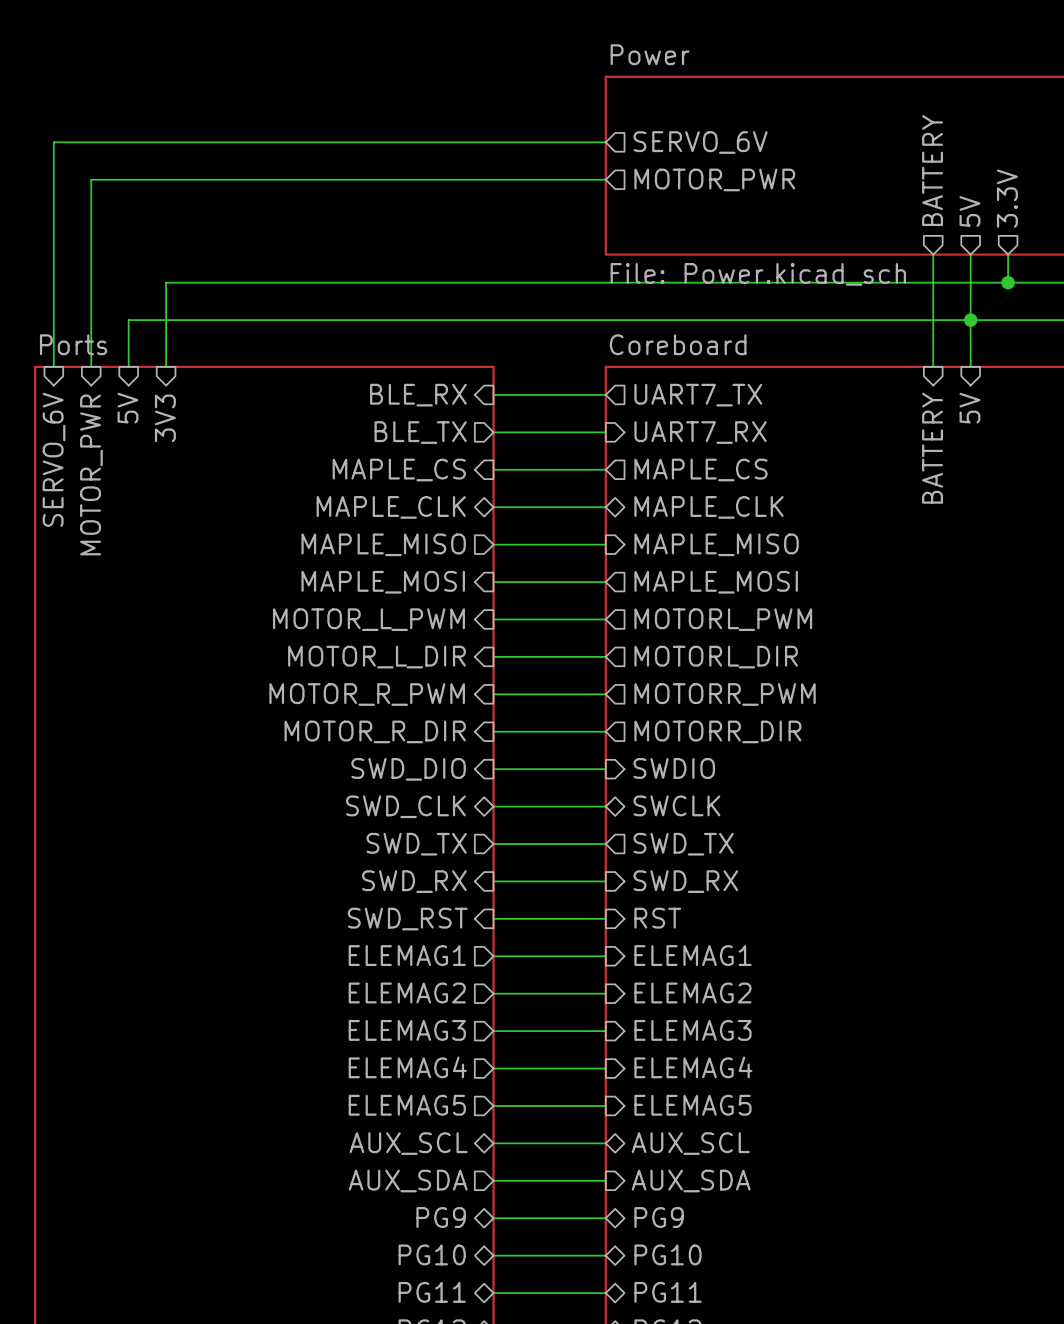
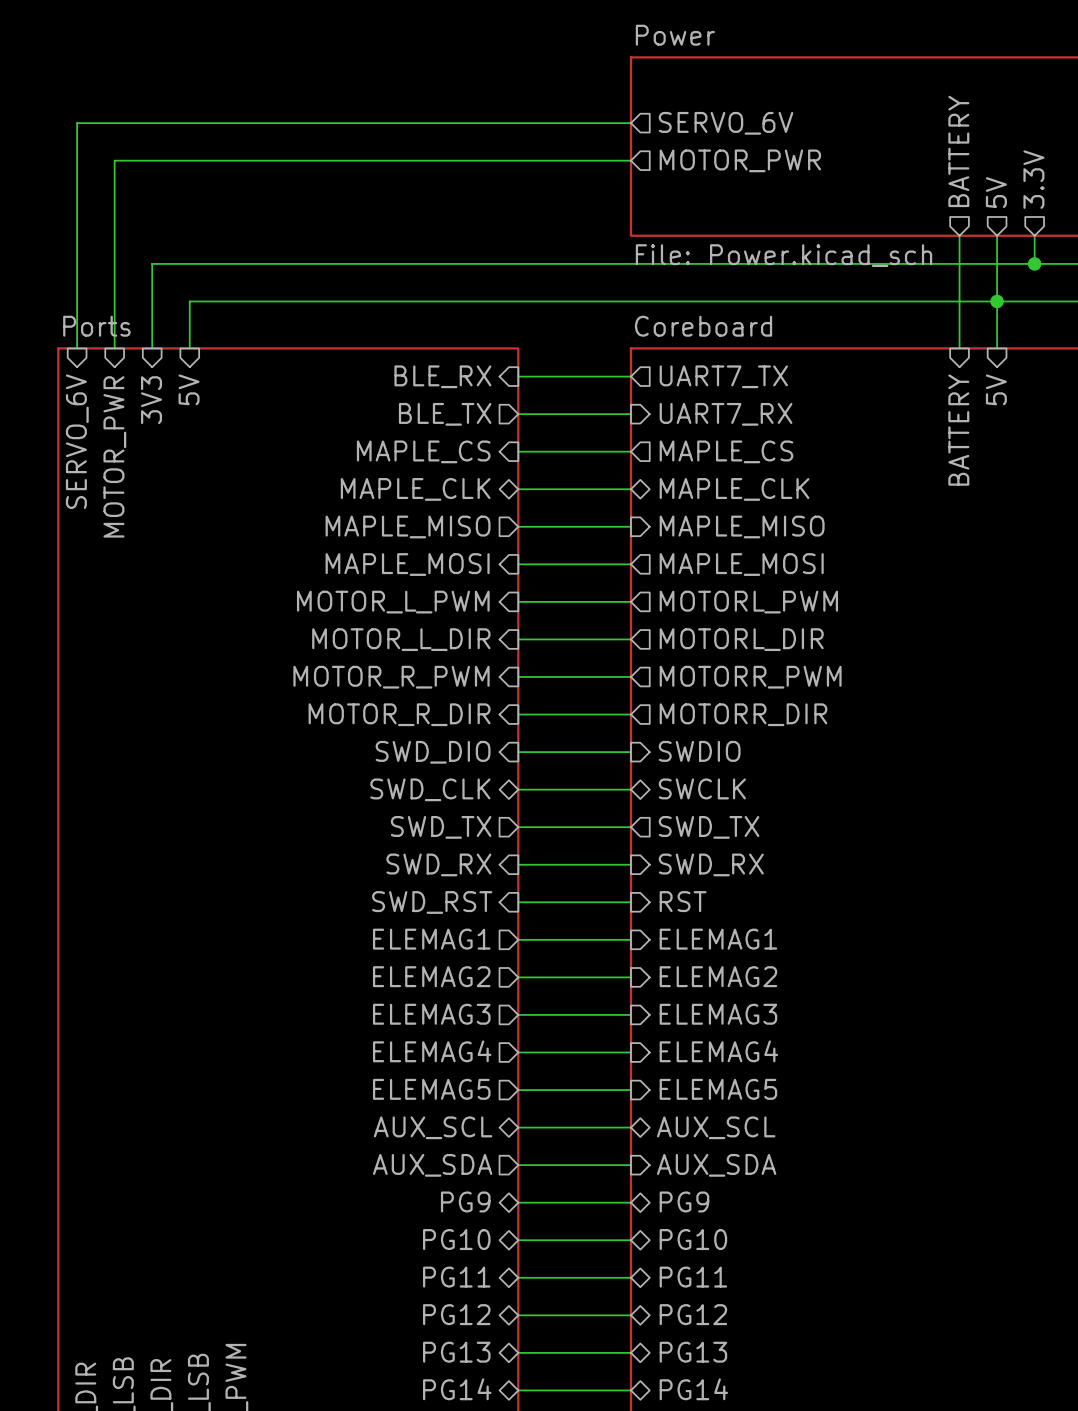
wire: (166, 282) (166, 320) (128, 320) -> (189, 263) (152, 263) (152, 301)
sheet pin: 5V (127, 408) -> 3V3 (151, 400)
sheet pin: 3V3 (165, 418) -> 5V (189, 389)

